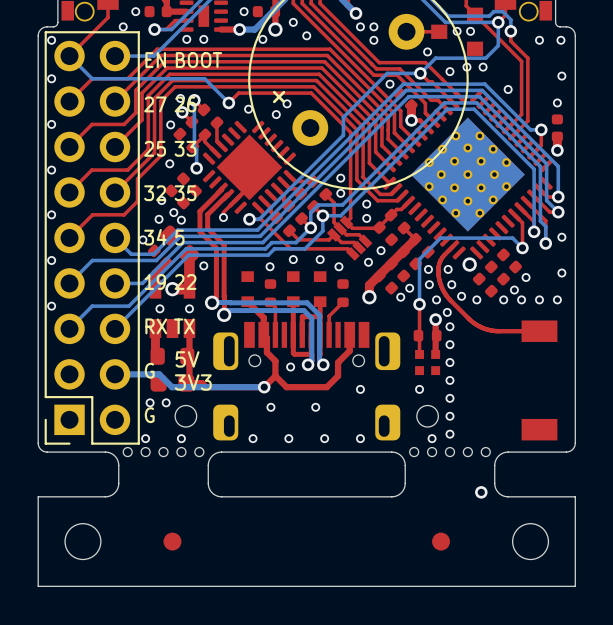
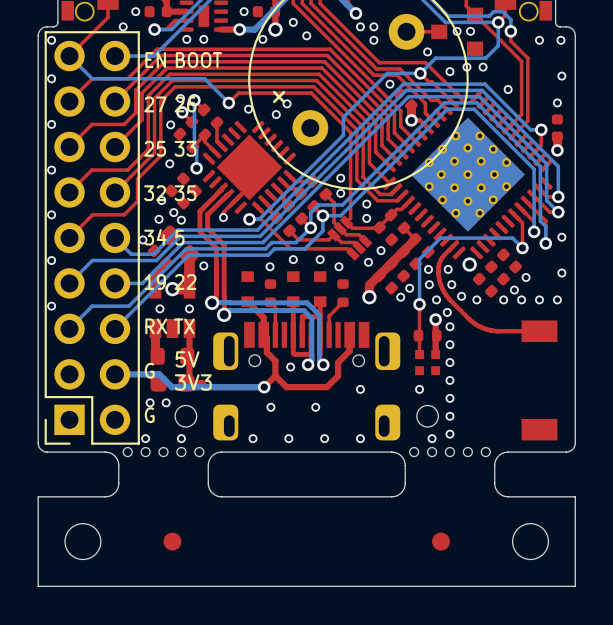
via: (481, 492) -> none

